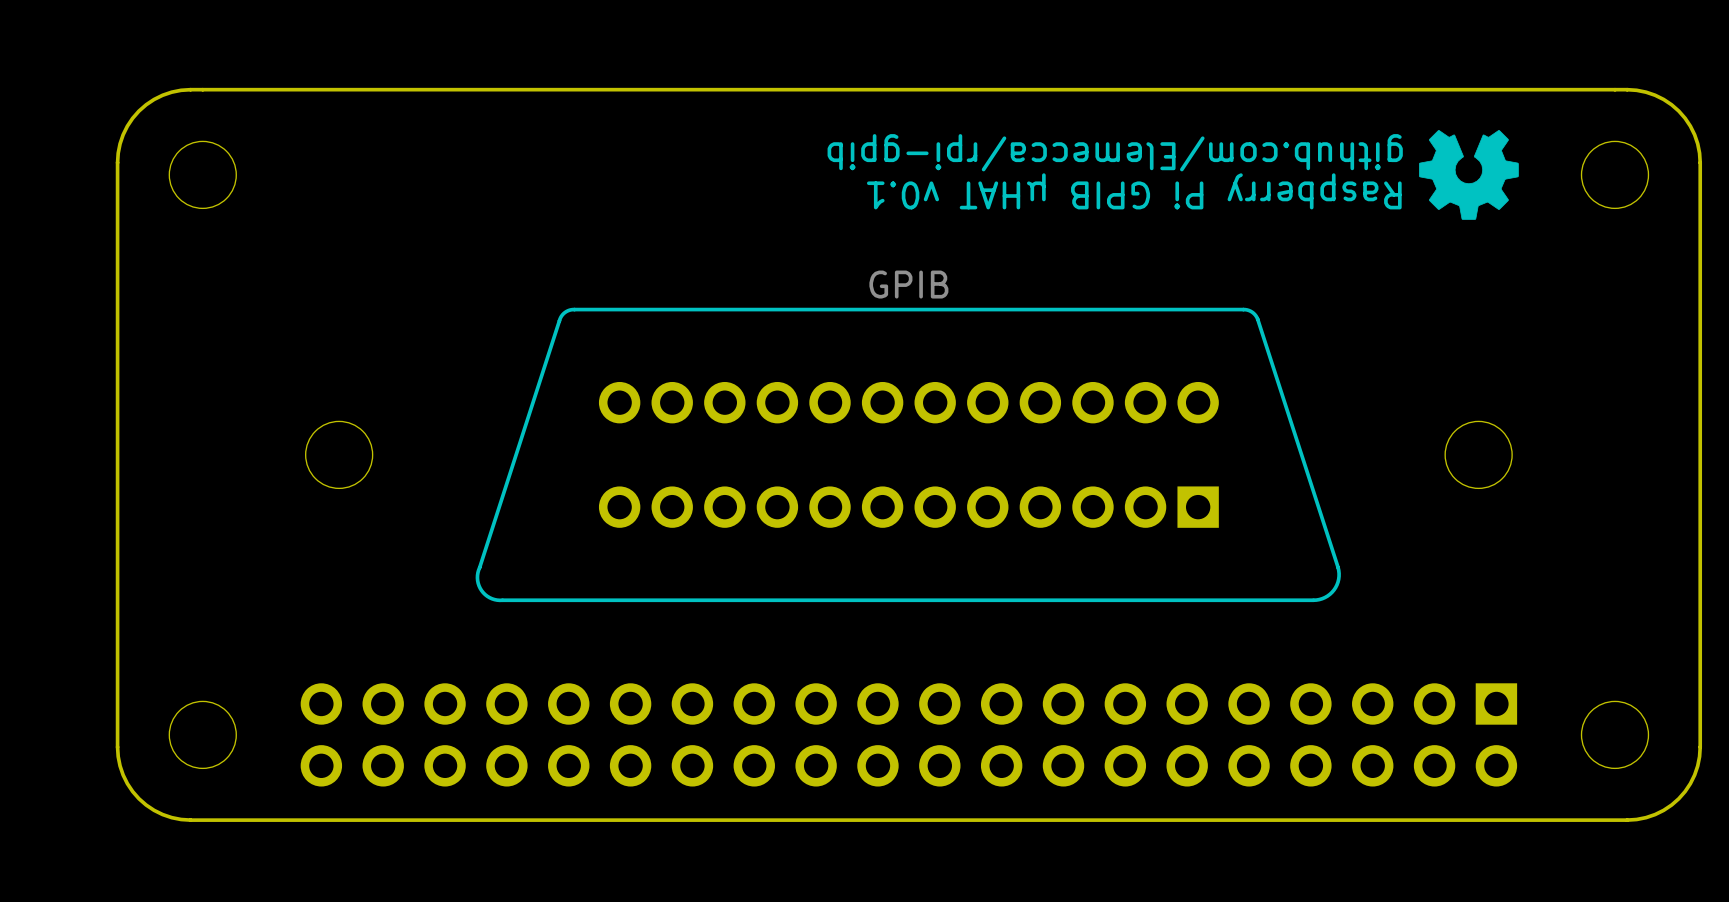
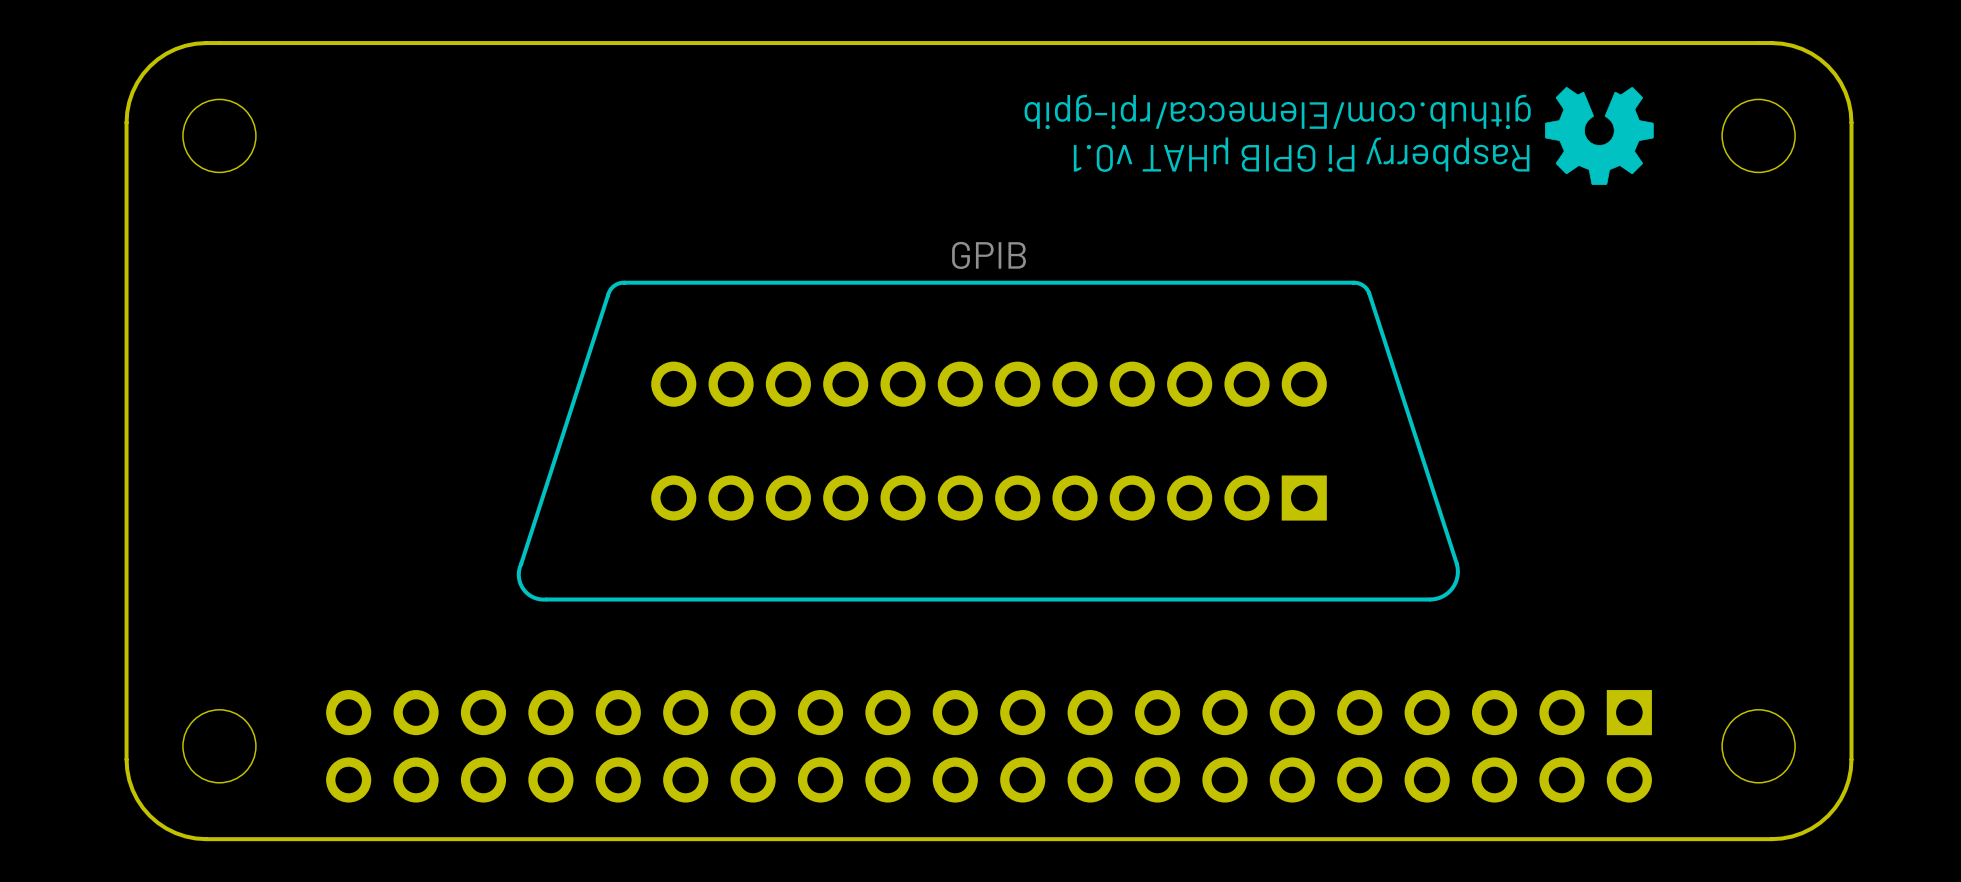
part footprint: [305, 307, 1513, 603] -> [516, 280, 1460, 602]

